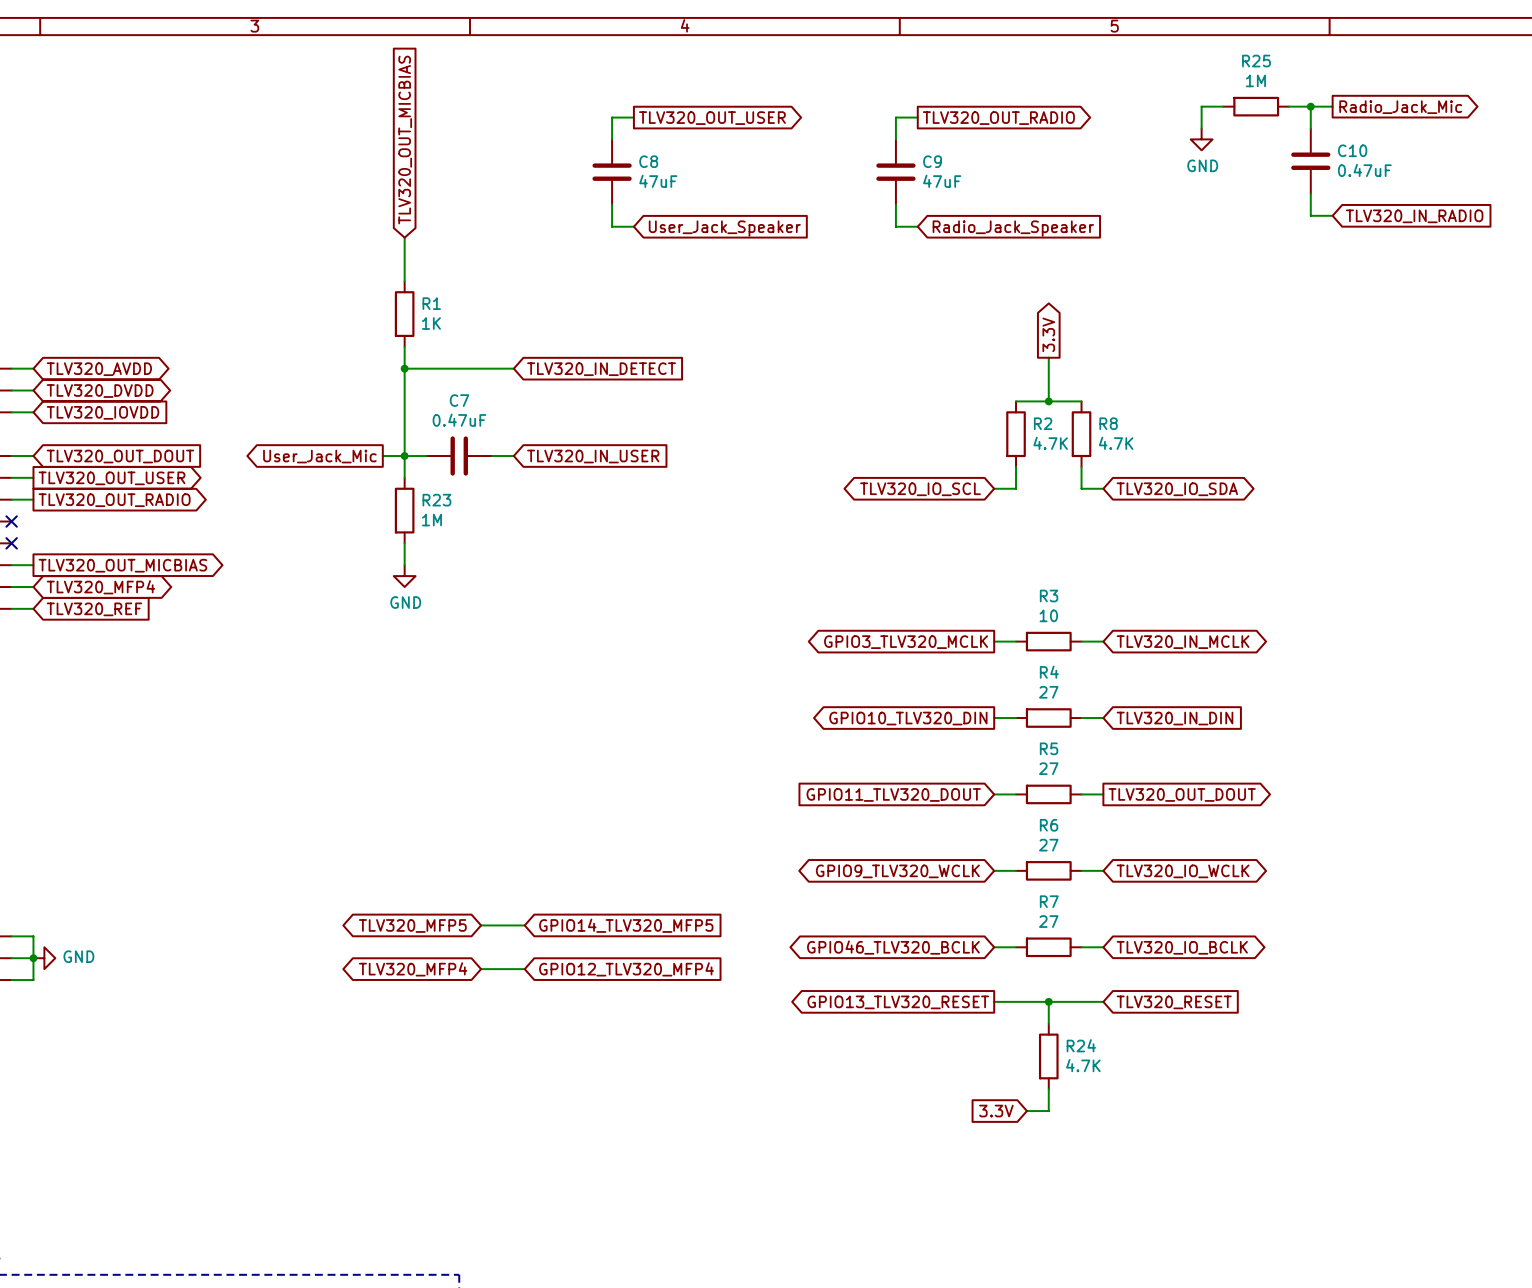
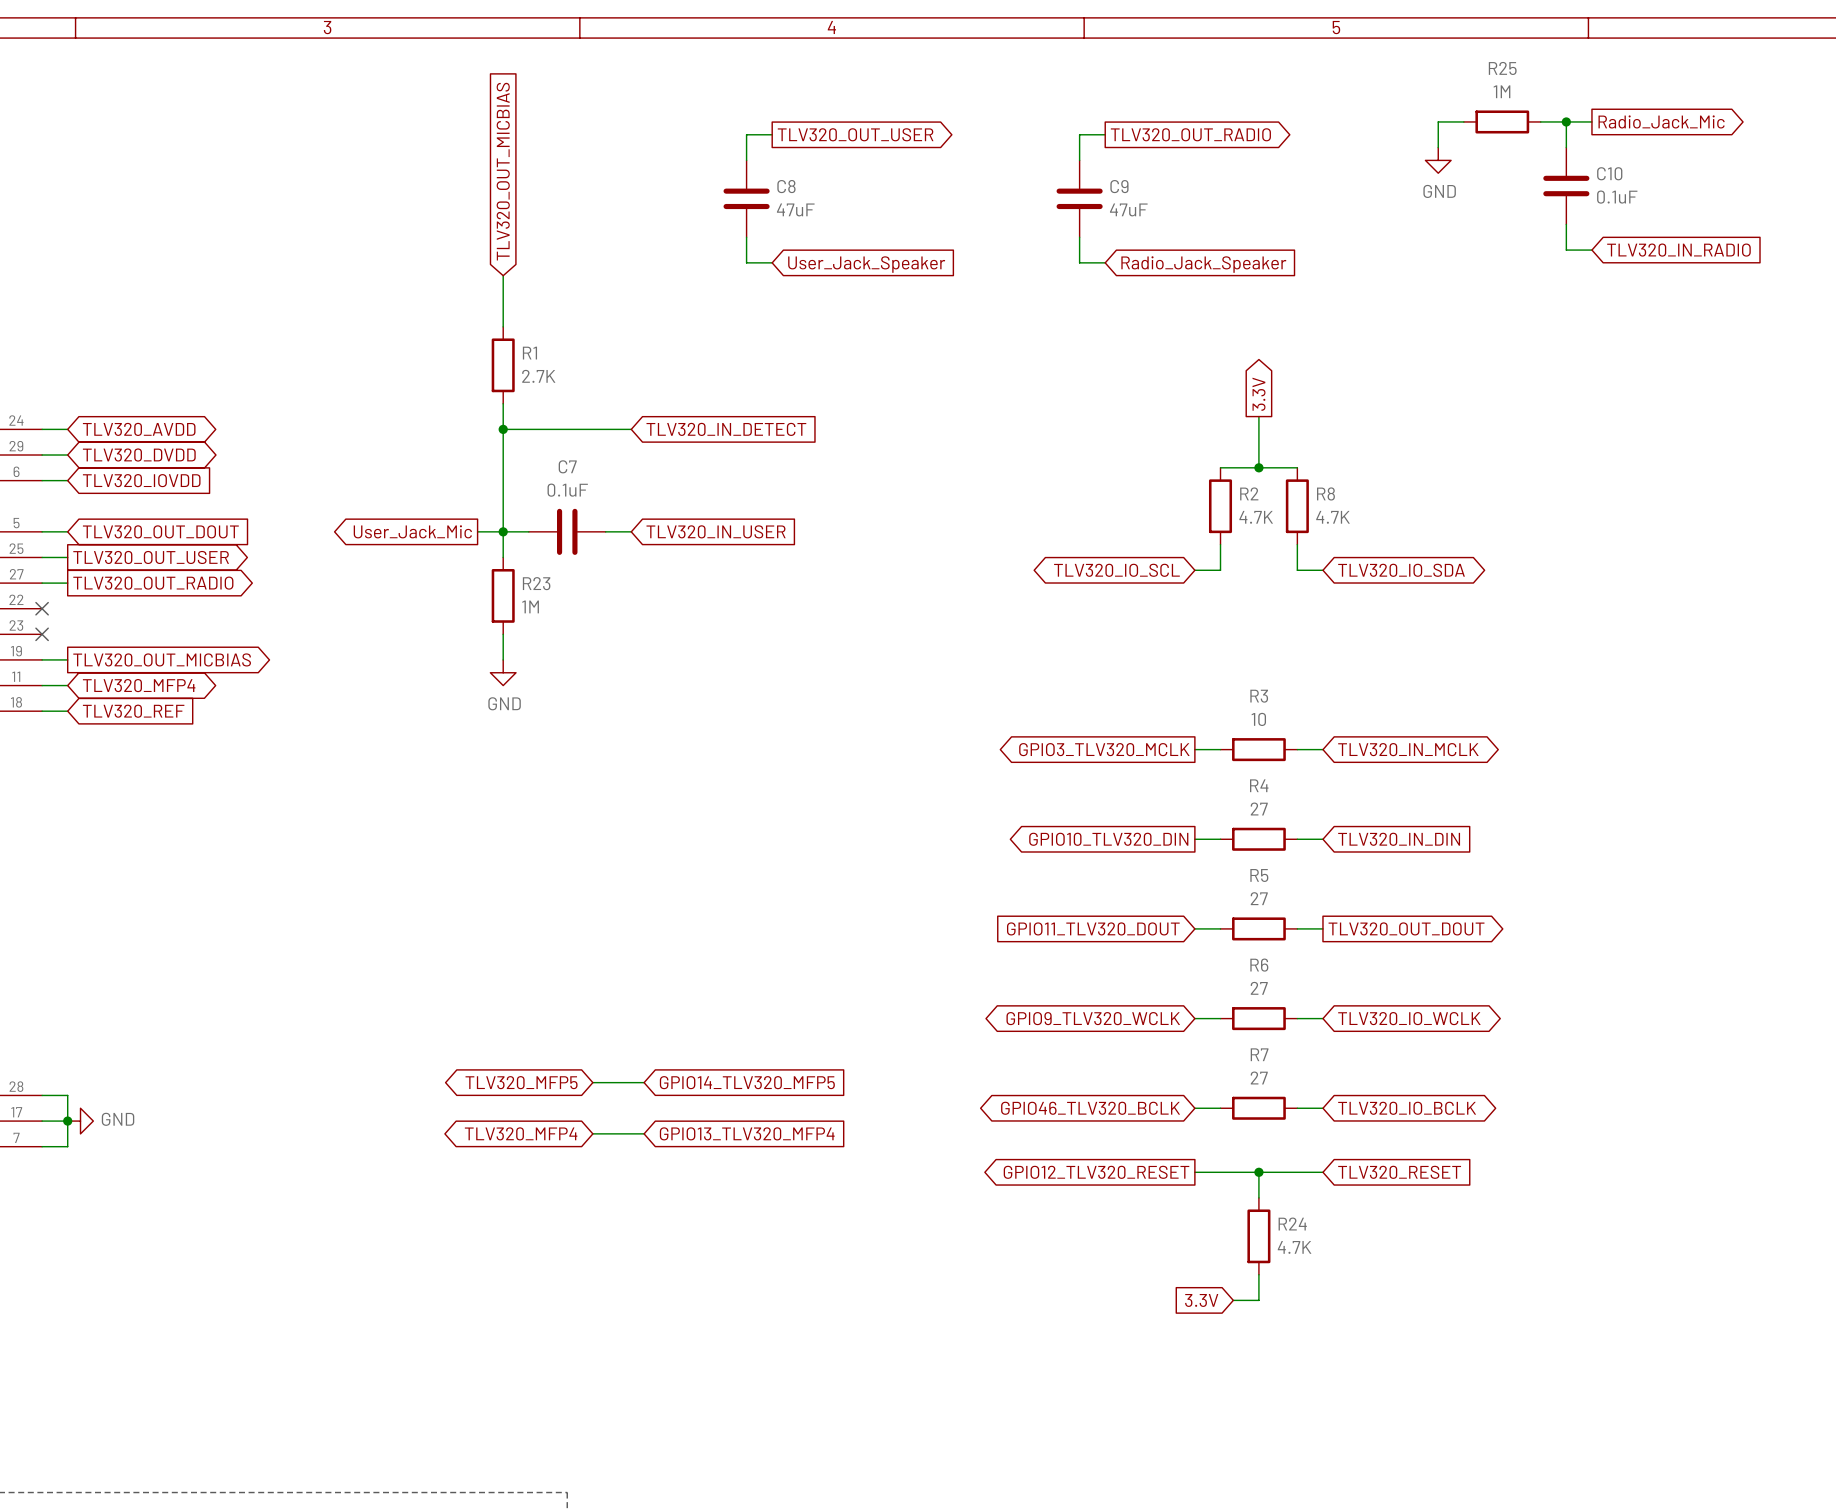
C10 value: 0.47uF (1364, 170) -> 0.1uF (1617, 197)
R1 value: 1K (431, 323) -> 2.7K (538, 376)
C7 value: 0.47uF (459, 420) -> 0.1uF (567, 490)
global label: GPIO12_TLV320_MFP4 (626, 969) -> GPIO13_TLV320_MFP4 (747, 1133)
global label: GPIO13_TLV320_RESET (898, 1002) -> GPIO12_TLV320_RESET (1096, 1172)

